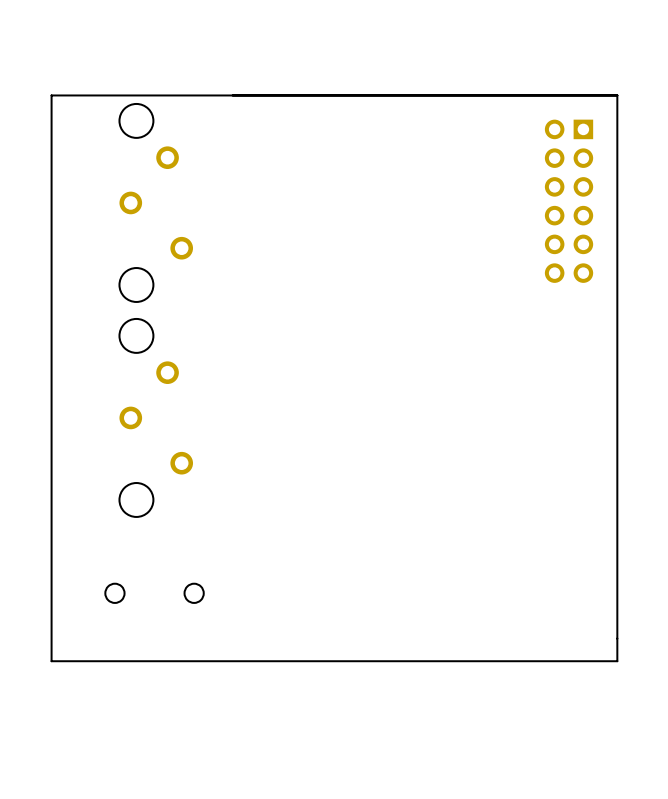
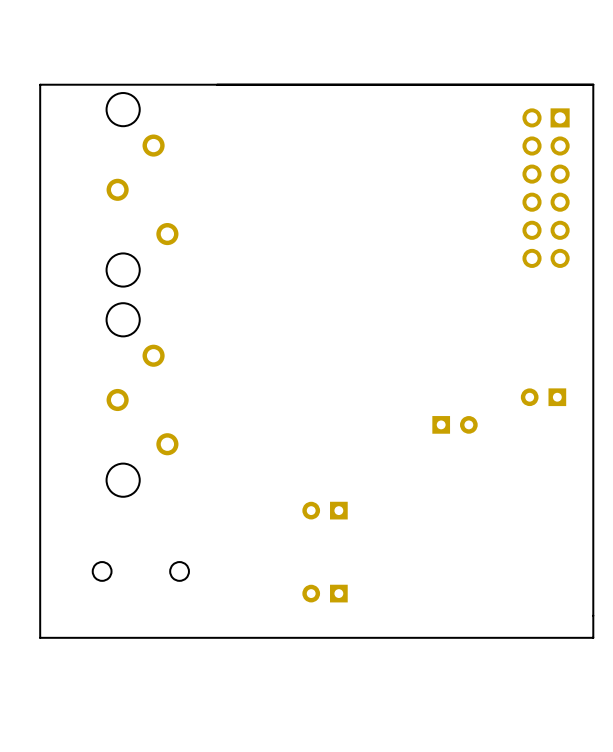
part: none -> (543, 397)
part: none -> (455, 424)
part: none -> (325, 510)
part: none -> (325, 593)

